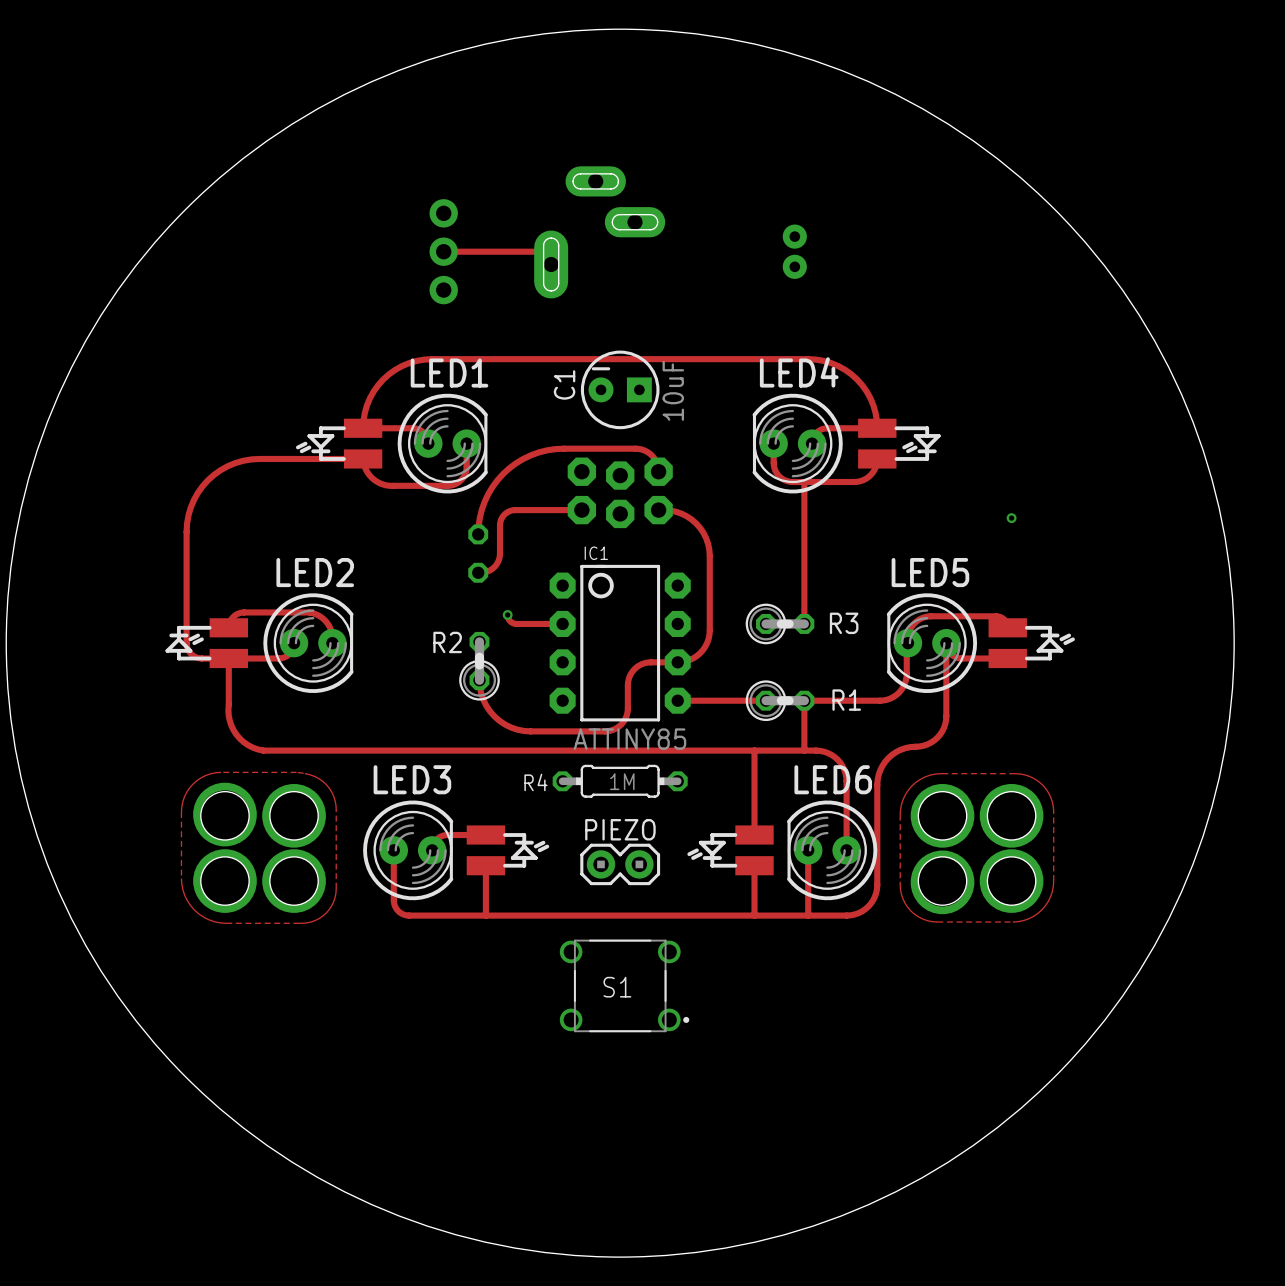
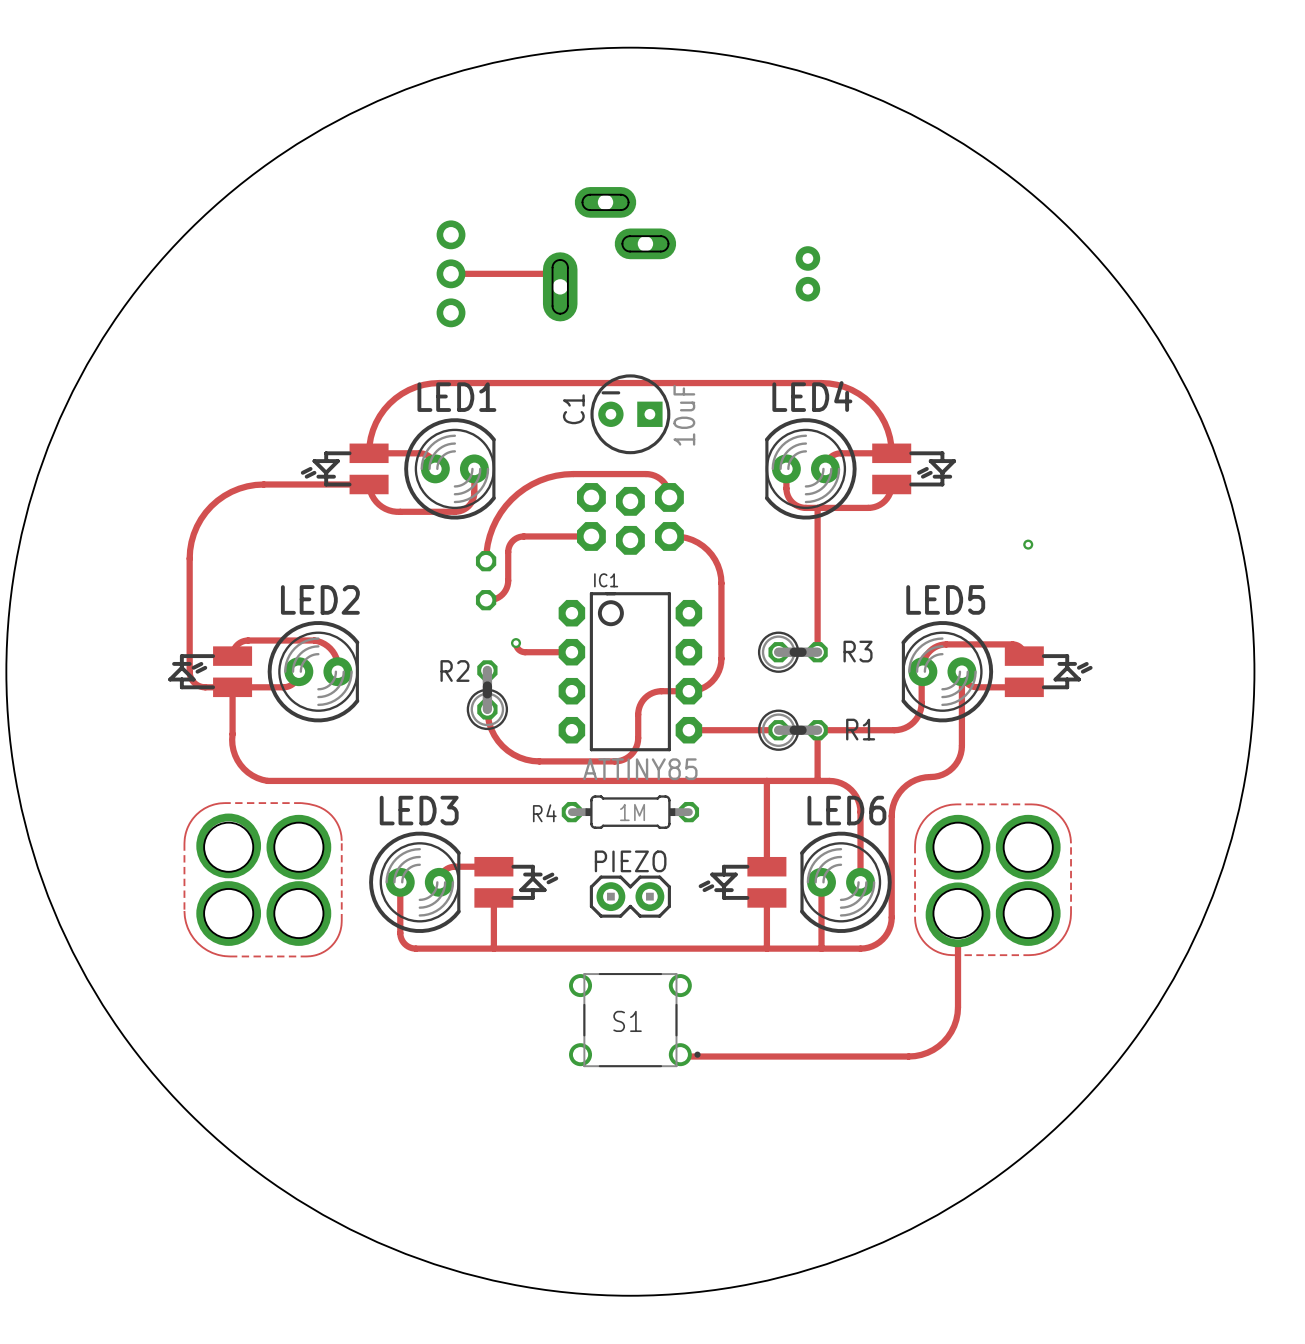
track: none -> (958, 913) (957, 1013) (951, 1031) (943, 1042) (933, 1049) (921, 1054) (908, 1056) (684, 1056) (682, 1054)

